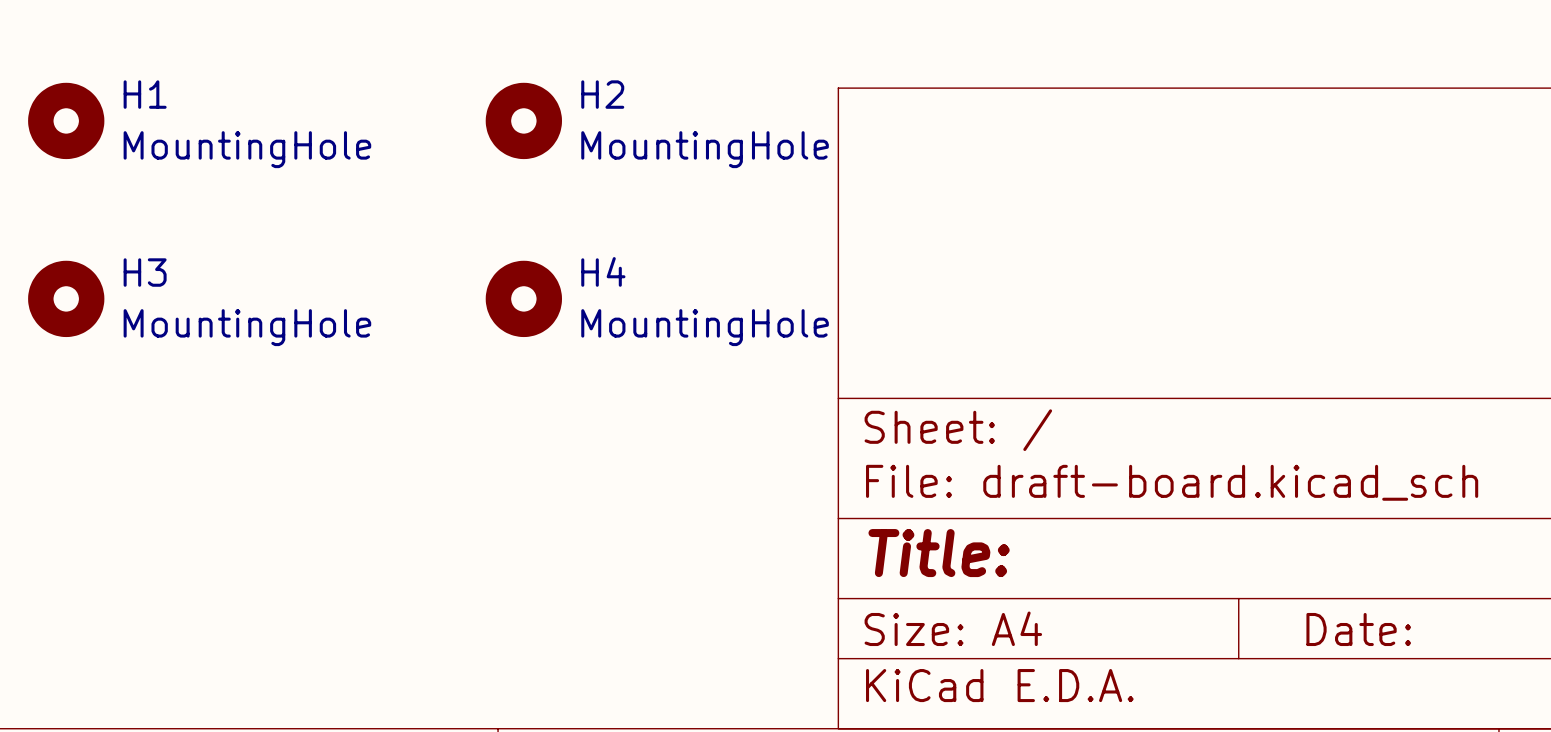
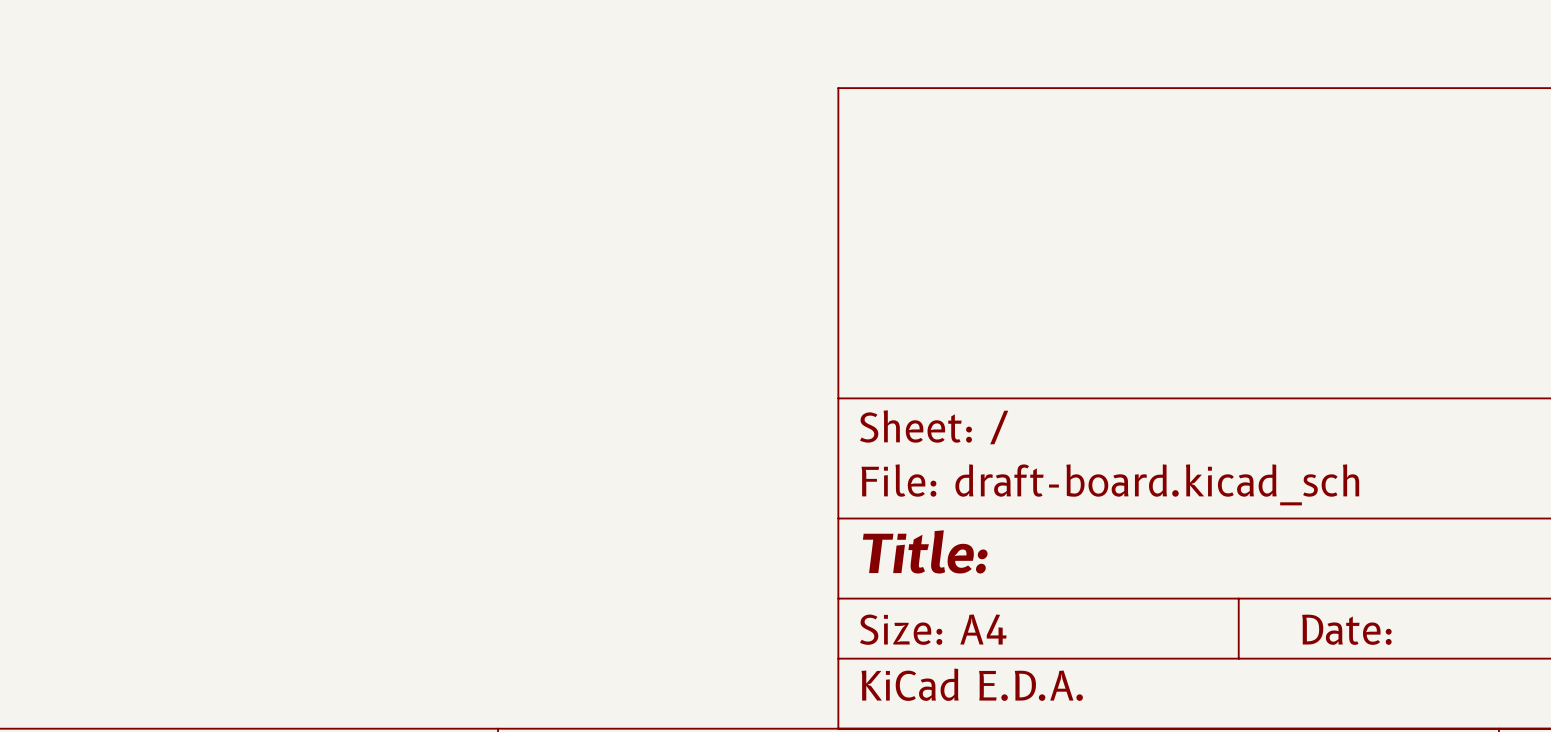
H1: MountingHole (66, 120) -> none
H2: MountingHole (523, 120) -> none
H3: MountingHole (66, 298) -> none
H4: MountingHole (523, 298) -> none

